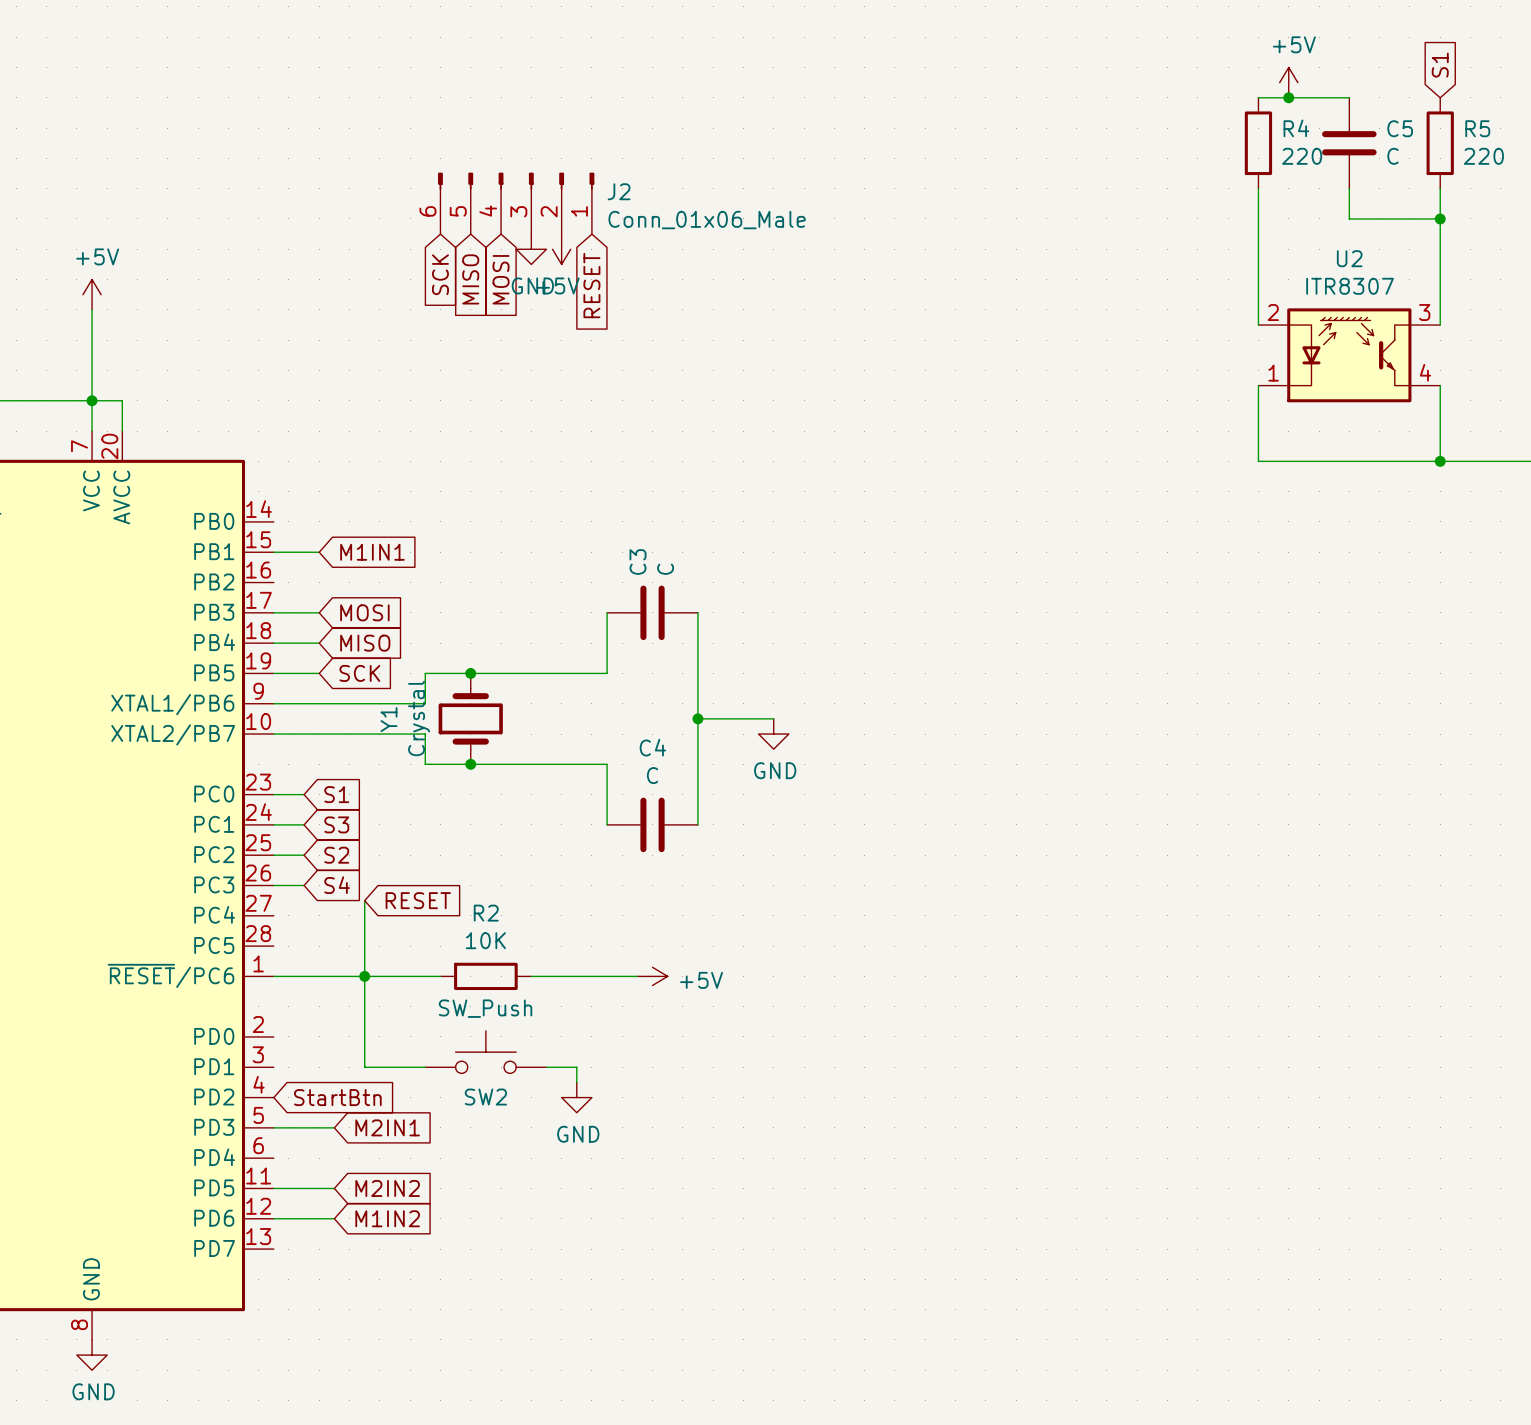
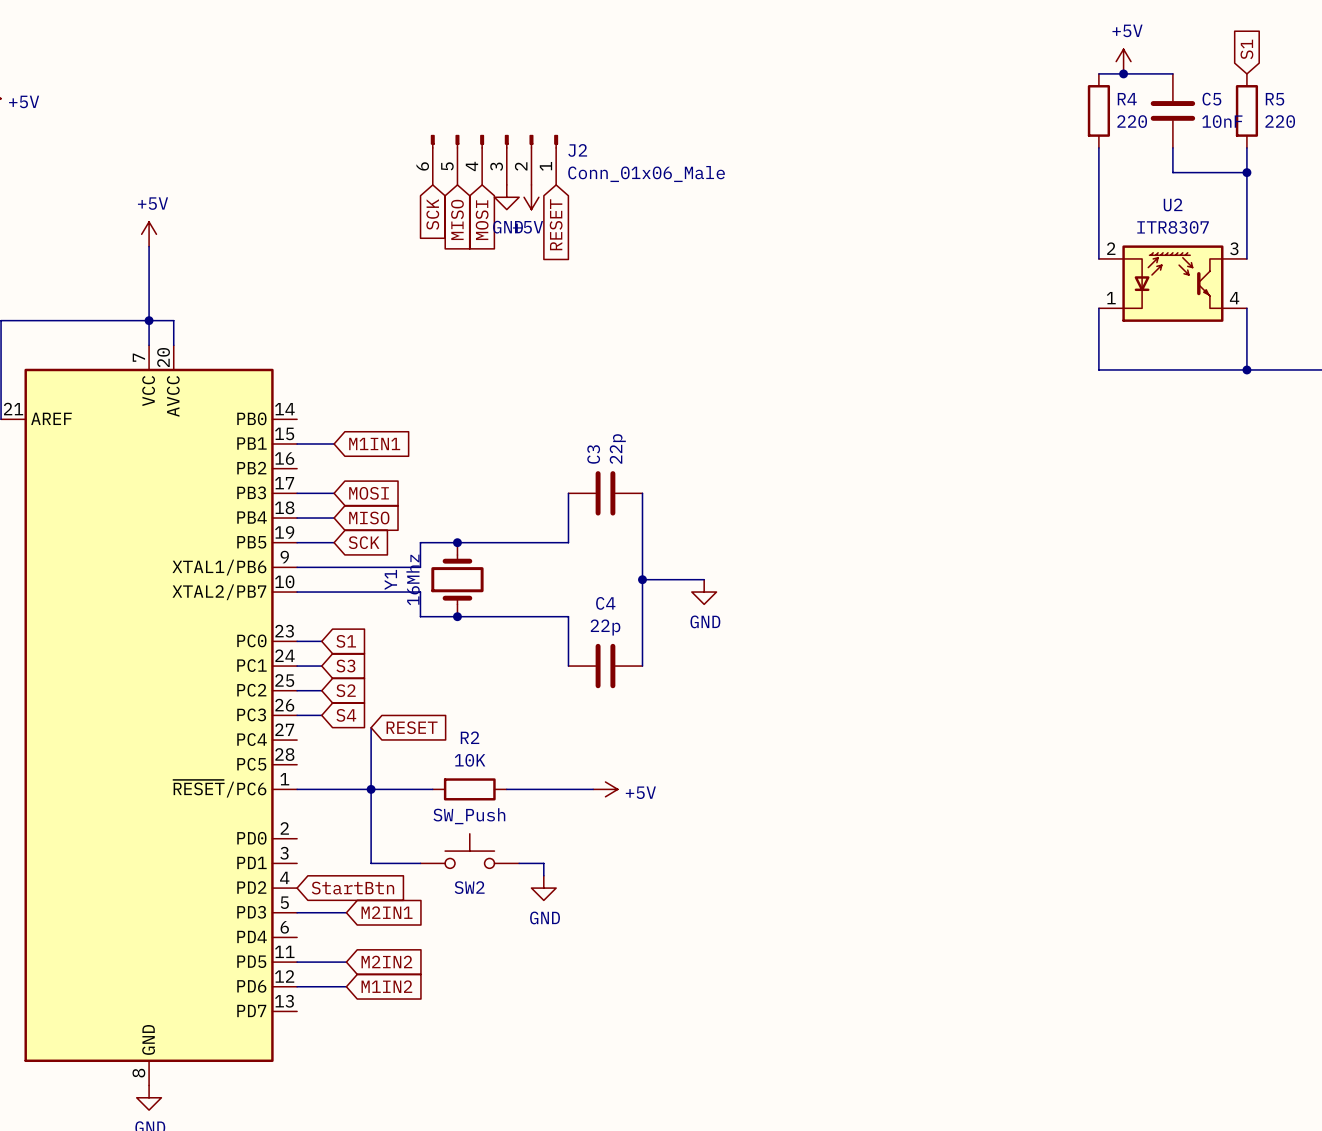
C5 value: C (1392, 156) -> 10nF (1222, 121)
C3 value: C (665, 569) -> 22p (617, 449)
Y1 value: Crystal (419, 718) -> 16Mhz (413, 579)
C4 value: C (652, 775) -> 22p (605, 627)

